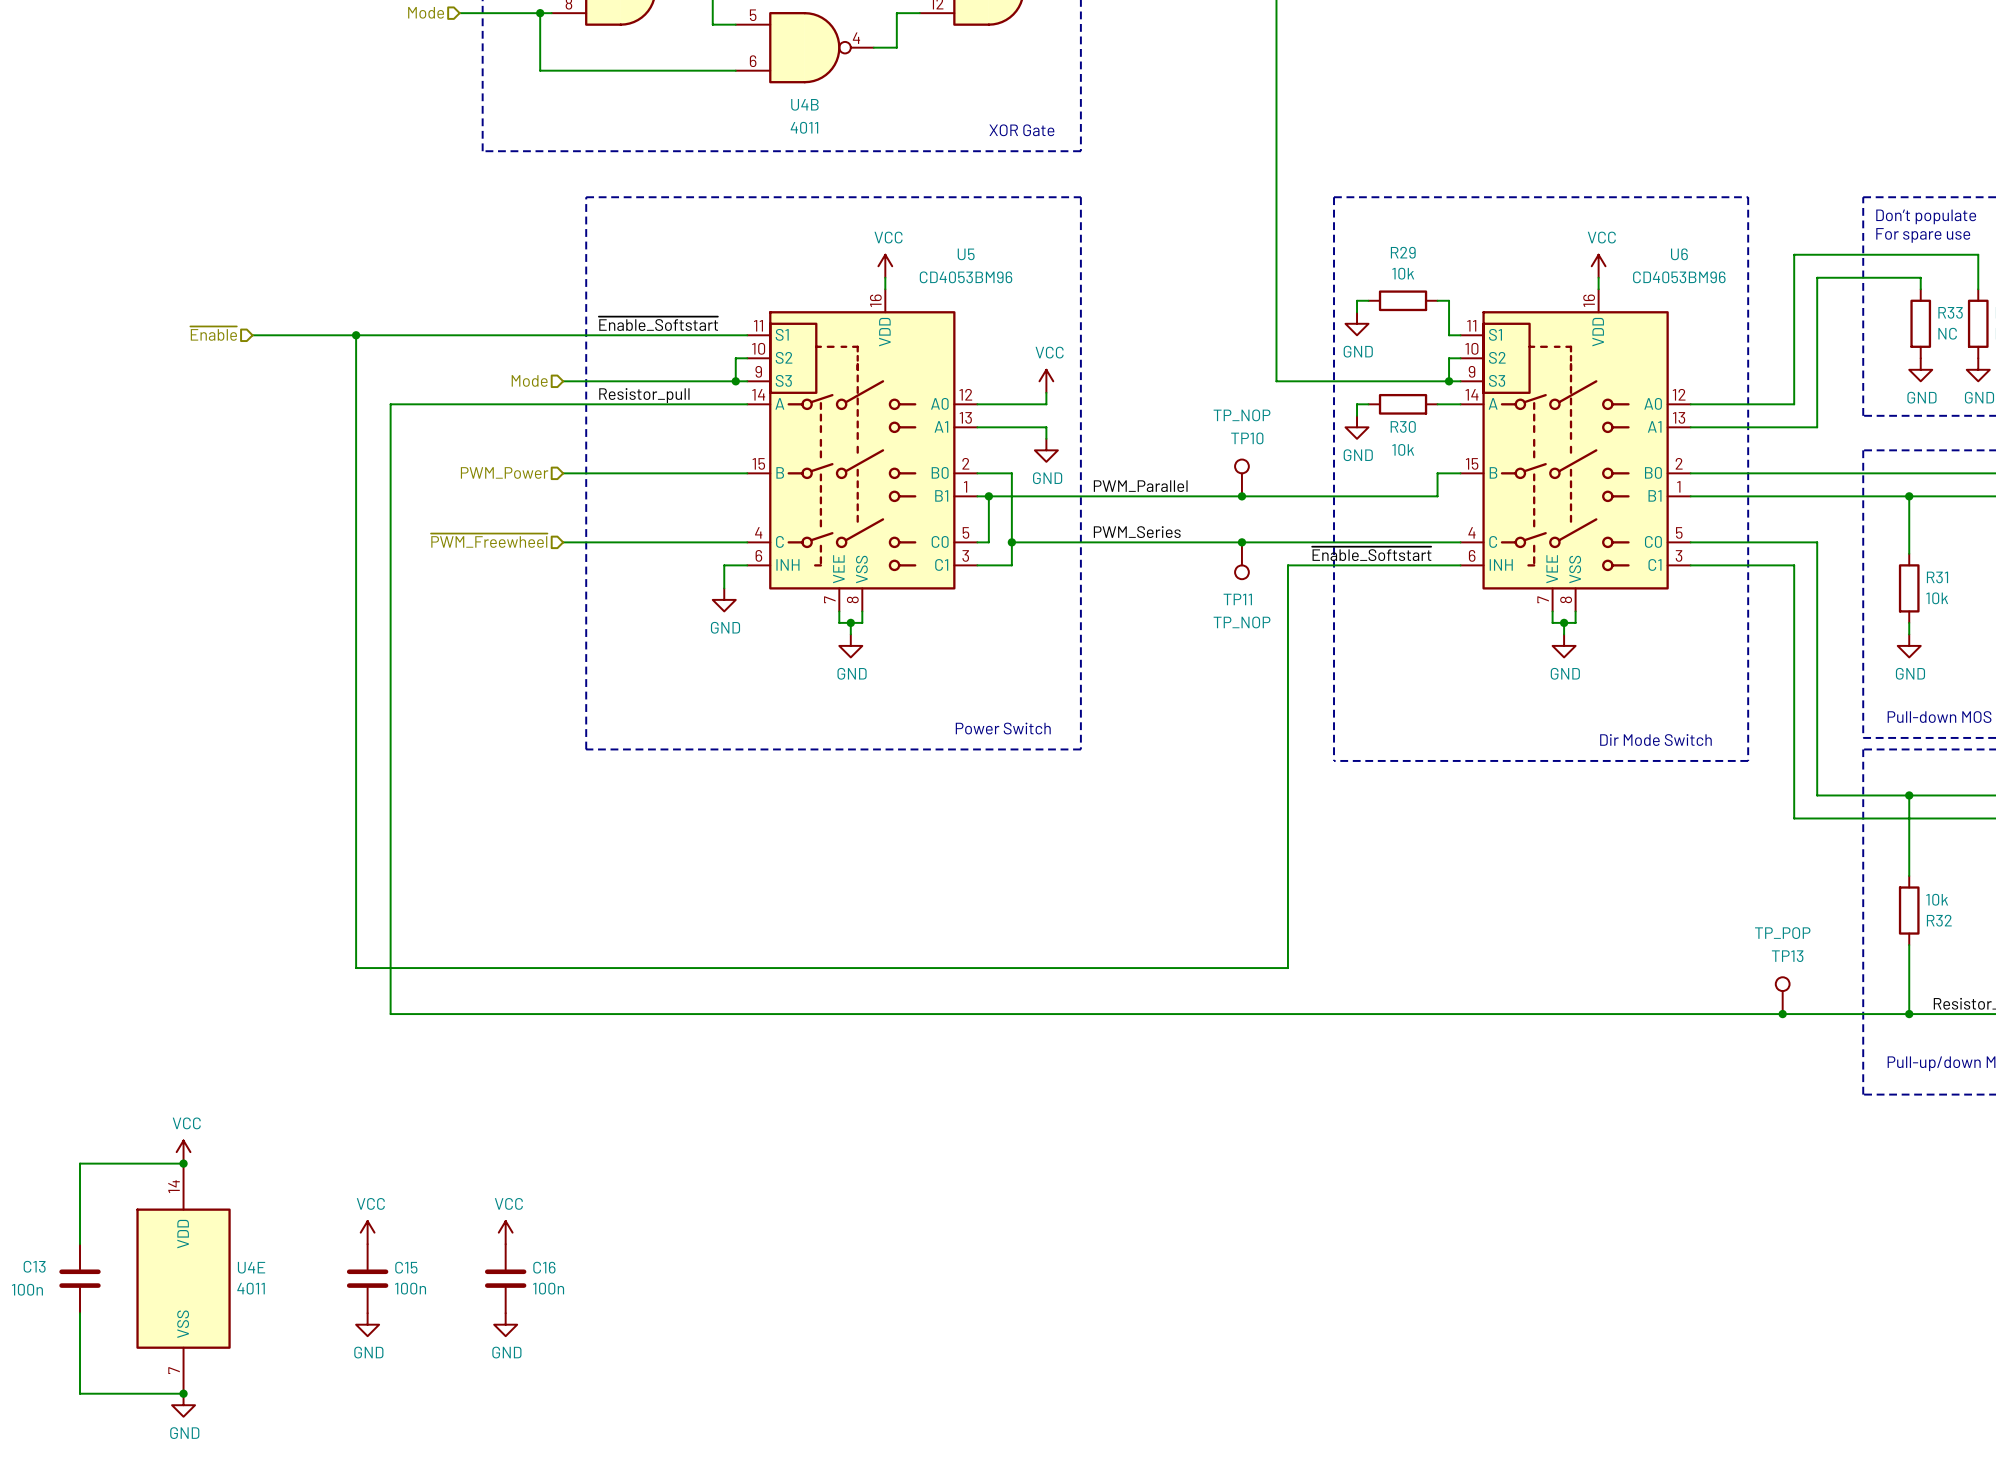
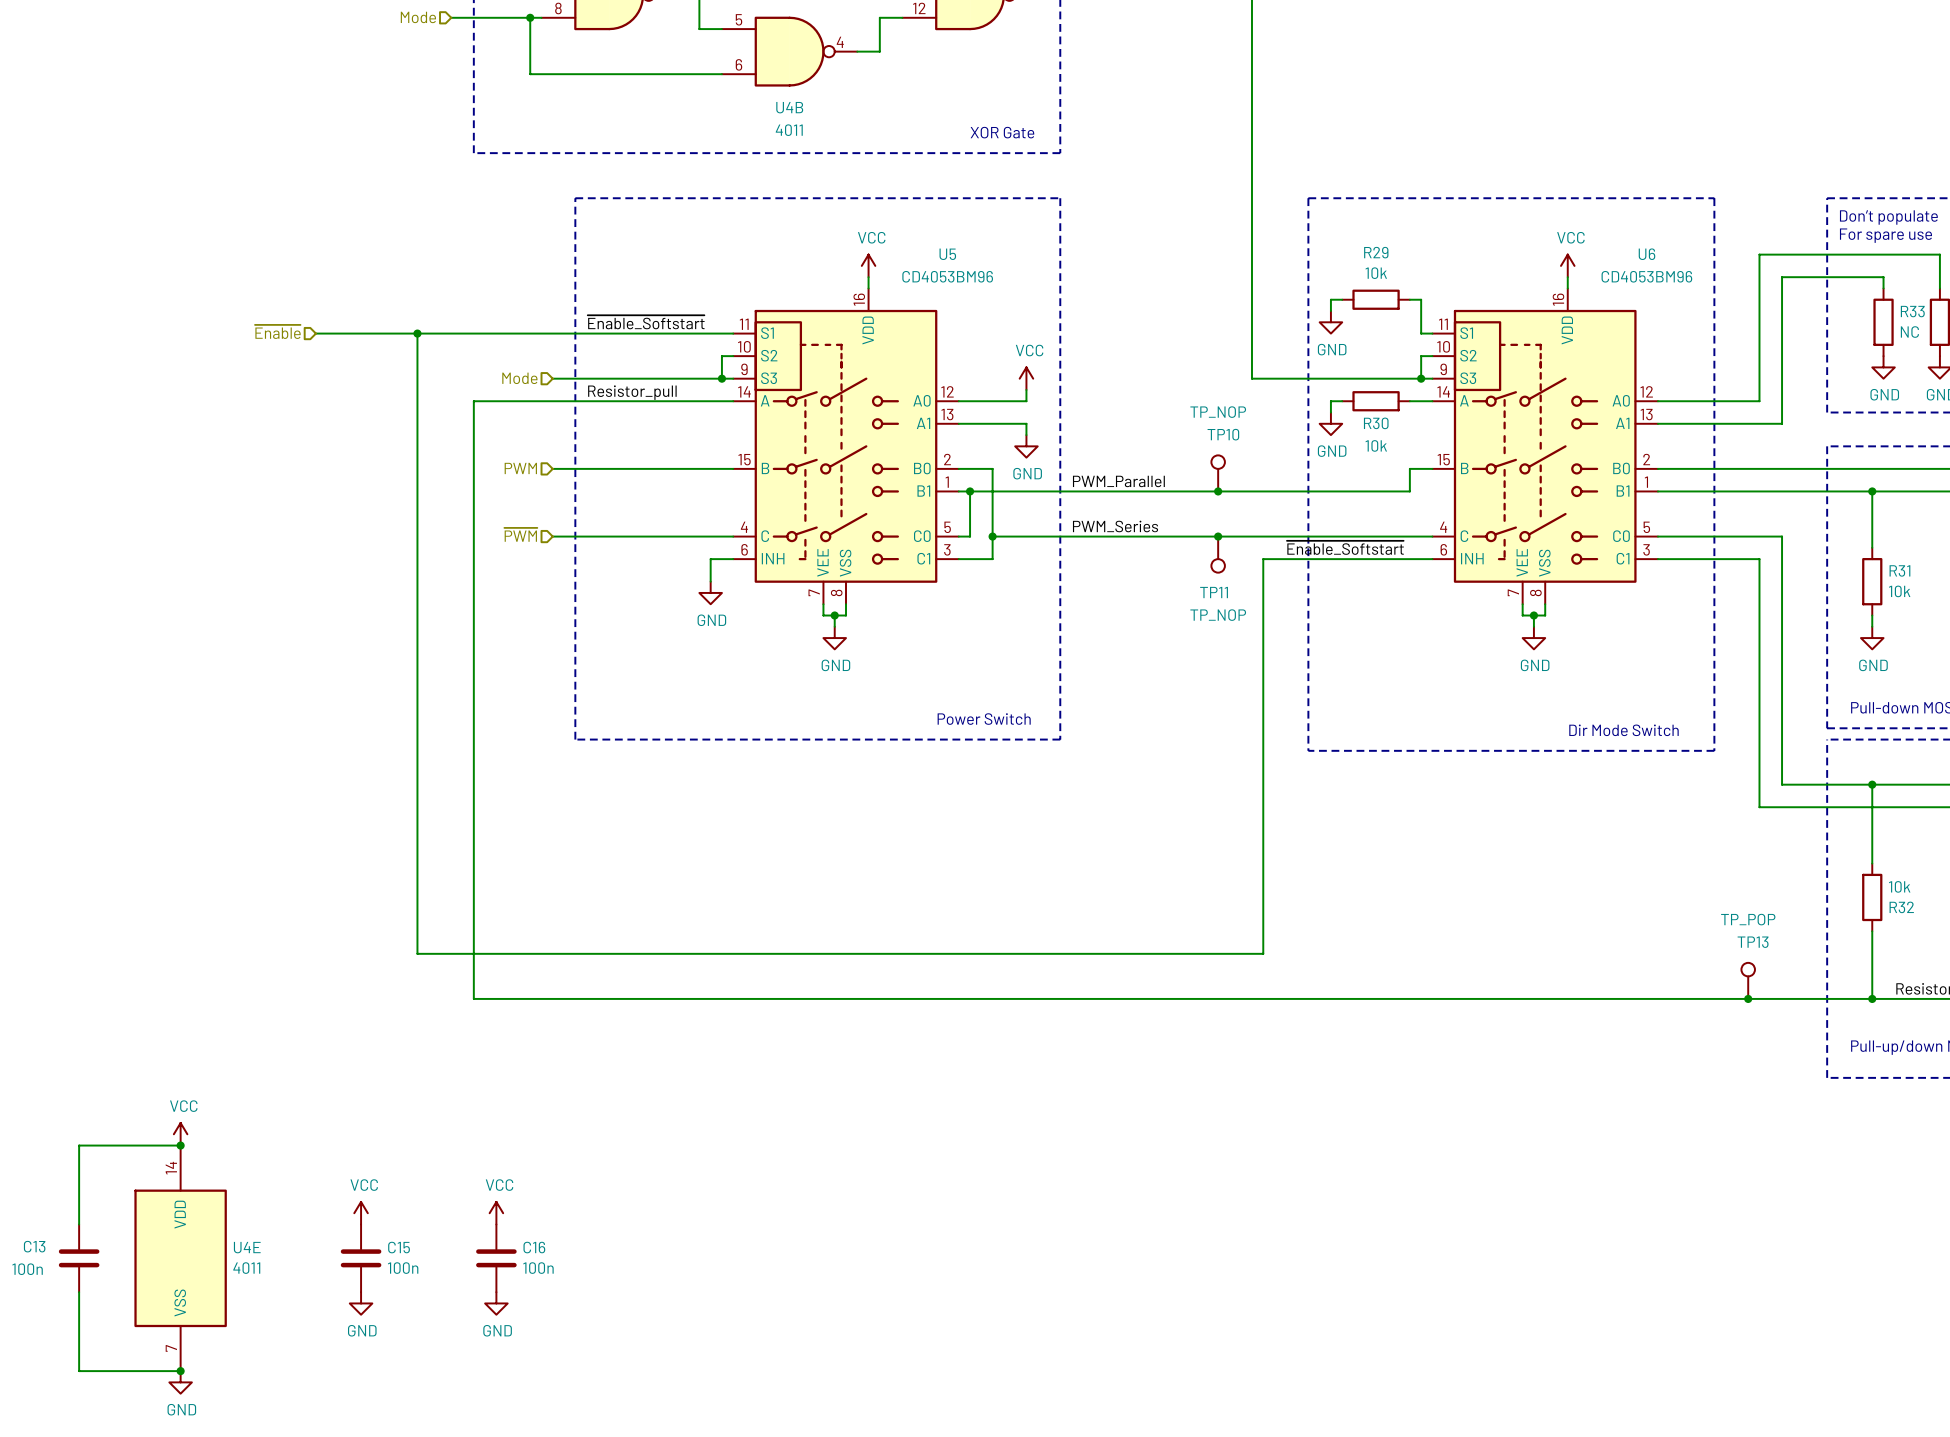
hierarchical label position: ~{Enable} (213, 333) -> ~{Enable} (277, 331)
wire: (252, 335) (321, 335) -> none
wire: (356, 335) (356, 968) (425, 968) -> (417, 333) (417, 953)
junction: (356, 335) -> none
junction: none -> (417, 333)
wire: (482, 404) (390, 404) (390, 1014) (482, 1014) -> (473, 401) (473, 998)
hierarchical label: PWM_Power (504, 472) -> PWM (520, 468)
hierarchical label: ~{PWM_Freewheel} (489, 540) -> ~{PWM} (520, 534)

